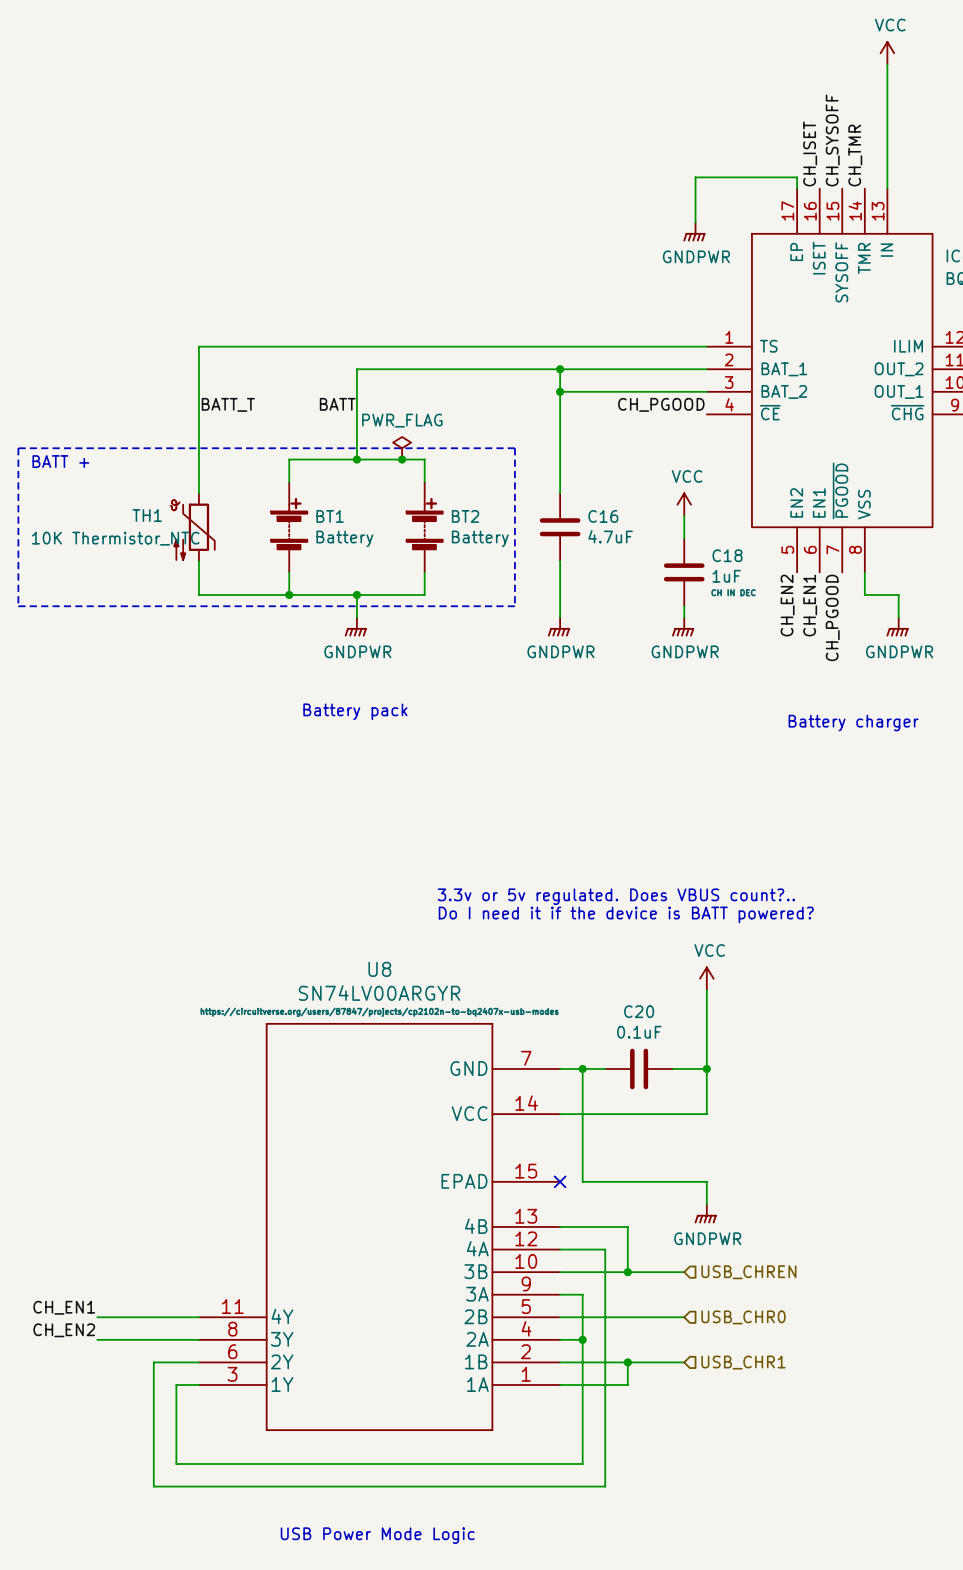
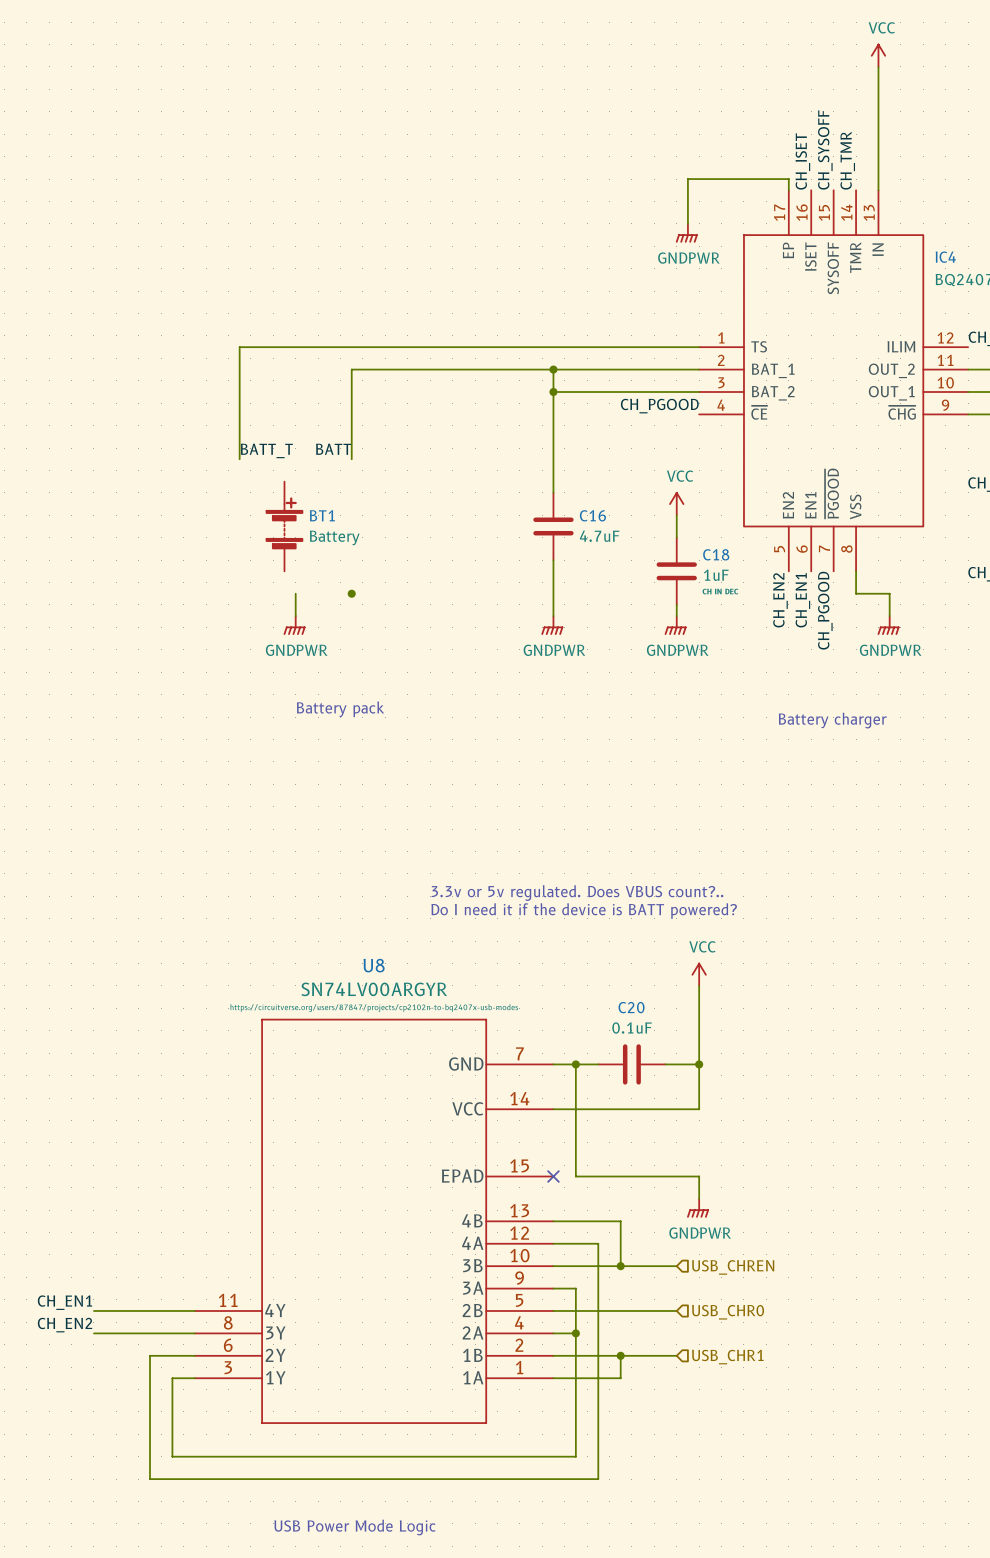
wire: (244, 346) (198, 346) (198, 493) -> (239, 347) (239, 459)
label position: BATT_T (228, 404) -> BATT_T (266, 450)
label position: BATT (337, 404) -> BATT (333, 449)
line: (18, 448) (514, 448) (514, 606) (18, 606) (18, 448) -> none
power symbol: PWR_FLAG (402, 448) -> none
junction: (356, 459) -> none
junction: (402, 459) -> none
text: BATT + (60, 461) -> none
wire: (289, 482) (289, 459) (424, 459) (424, 482) -> none
TH1: 10K Thermistor_NTC (192, 527) -> none
BT2: Battery (424, 527) -> none
wire: (198, 561) (198, 594) (424, 594) (424, 572) -> none
wire: (289, 572) (289, 594) -> (295, 593) (295, 616)
junction: (289, 594) -> none
wire: (356, 594) (356, 617) -> none
power symbol position: GNDPWR (355, 627) -> GNDPWR (294, 625)

